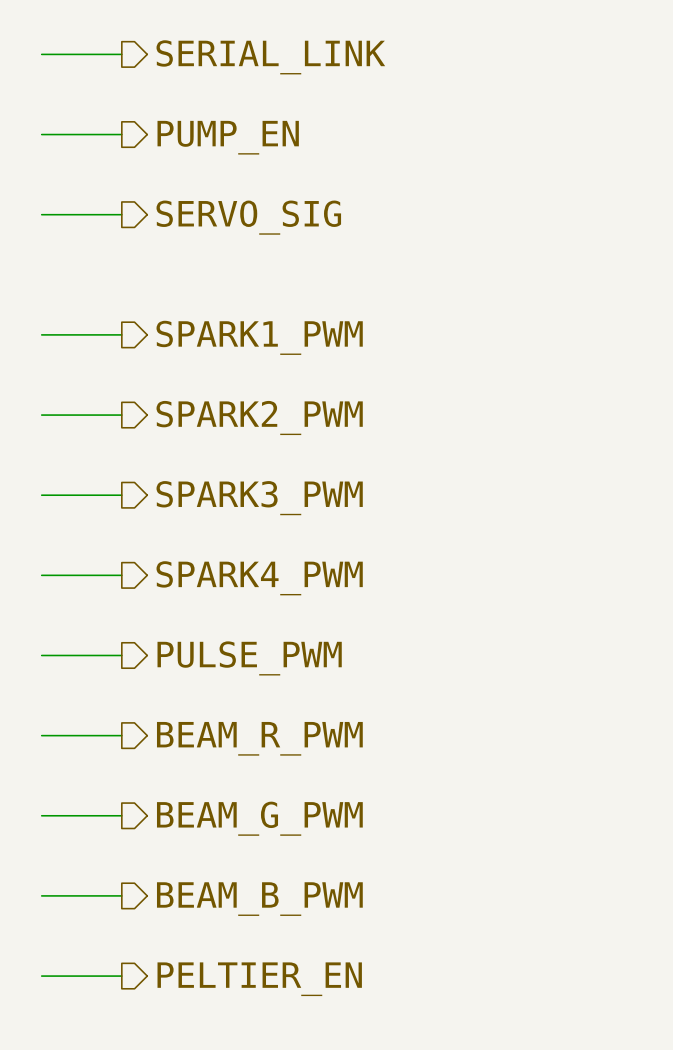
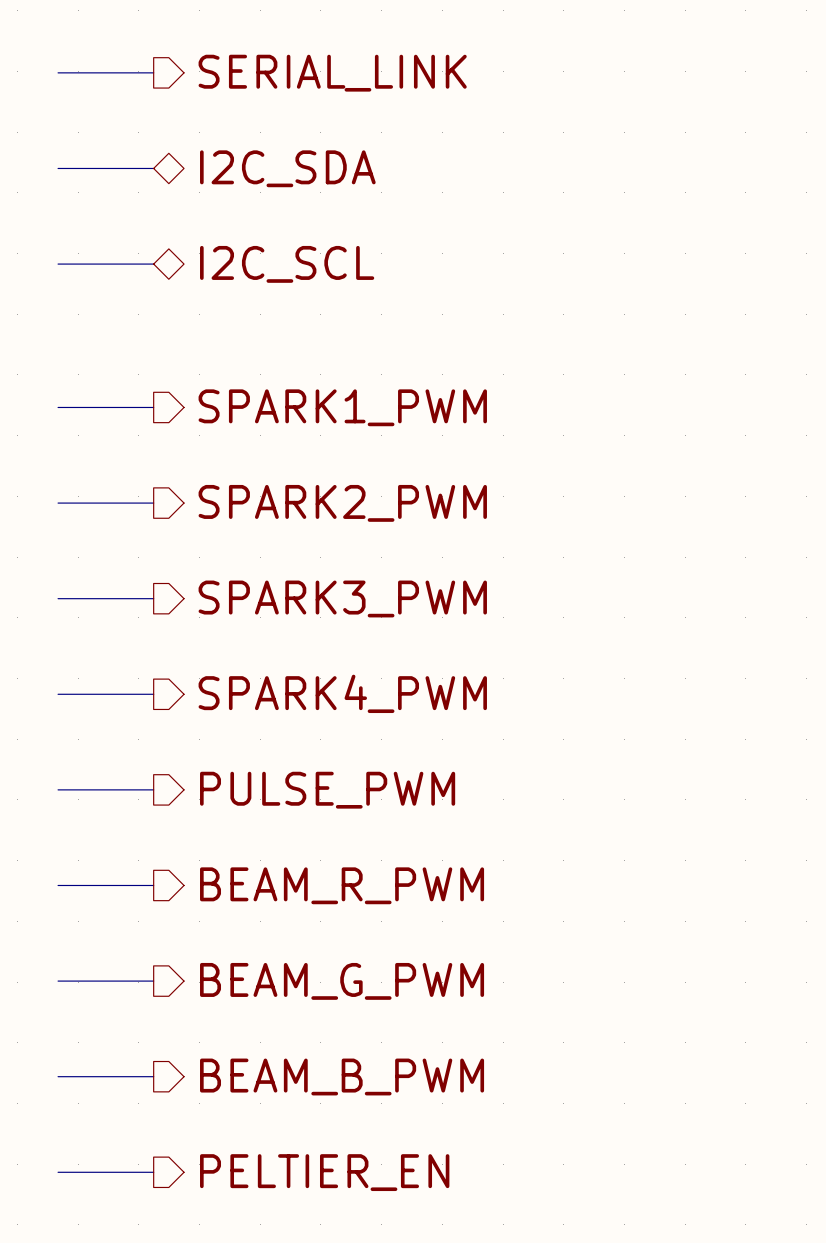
hierarchical label shape: output (228, 137) -> bidirectional (287, 168)
hierarchical label: PUMP_EN (228, 137) -> I2C_SDA (287, 168)
hierarchical label shape: output (248, 217) -> bidirectional (287, 264)
hierarchical label: SERVO_SIG (248, 217) -> I2C_SCL (287, 264)

